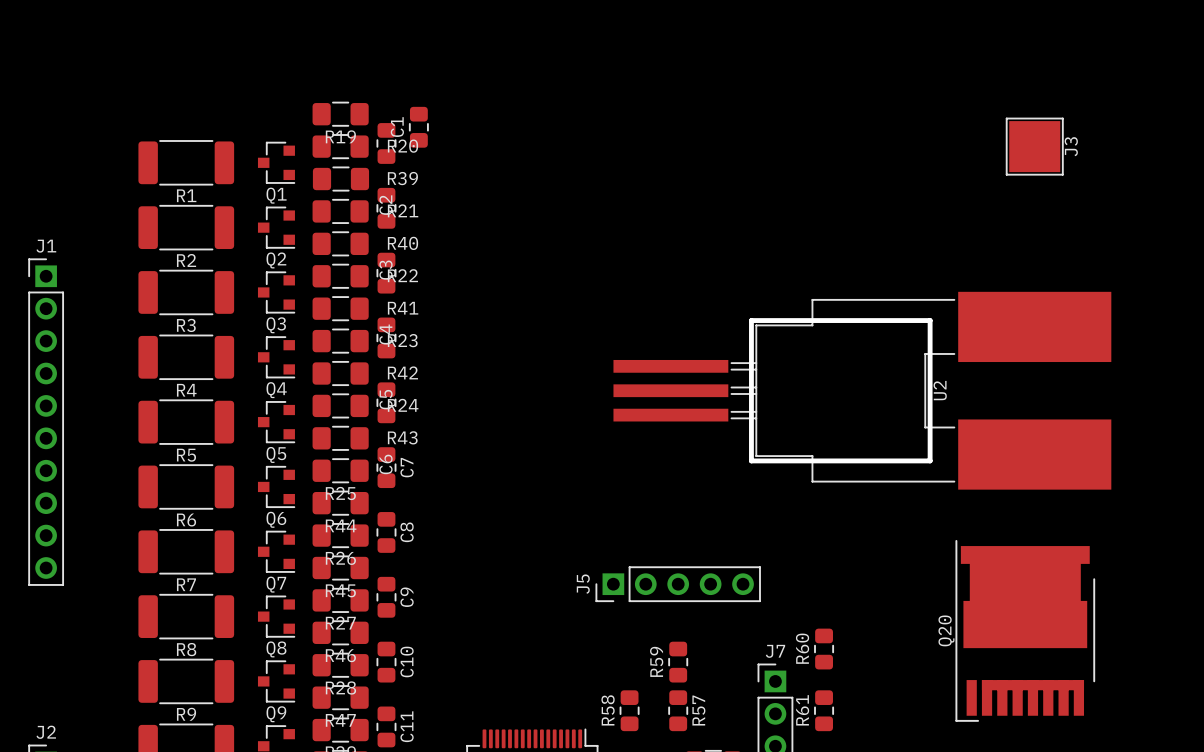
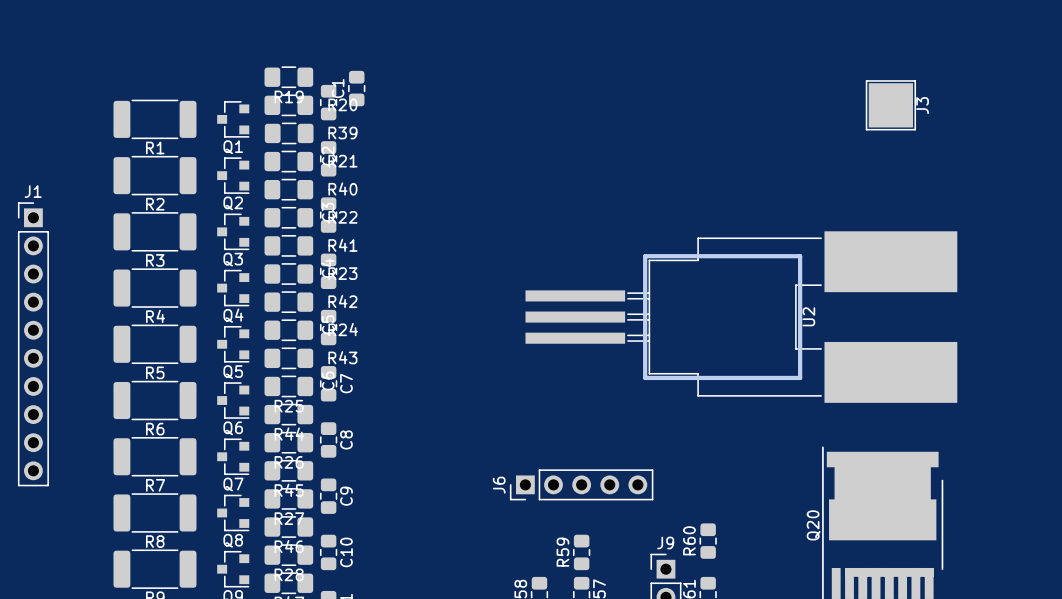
J5 name: J5 (583, 584) -> J6 (499, 485)
J7 name: J7 (775, 651) -> J9 (665, 543)

